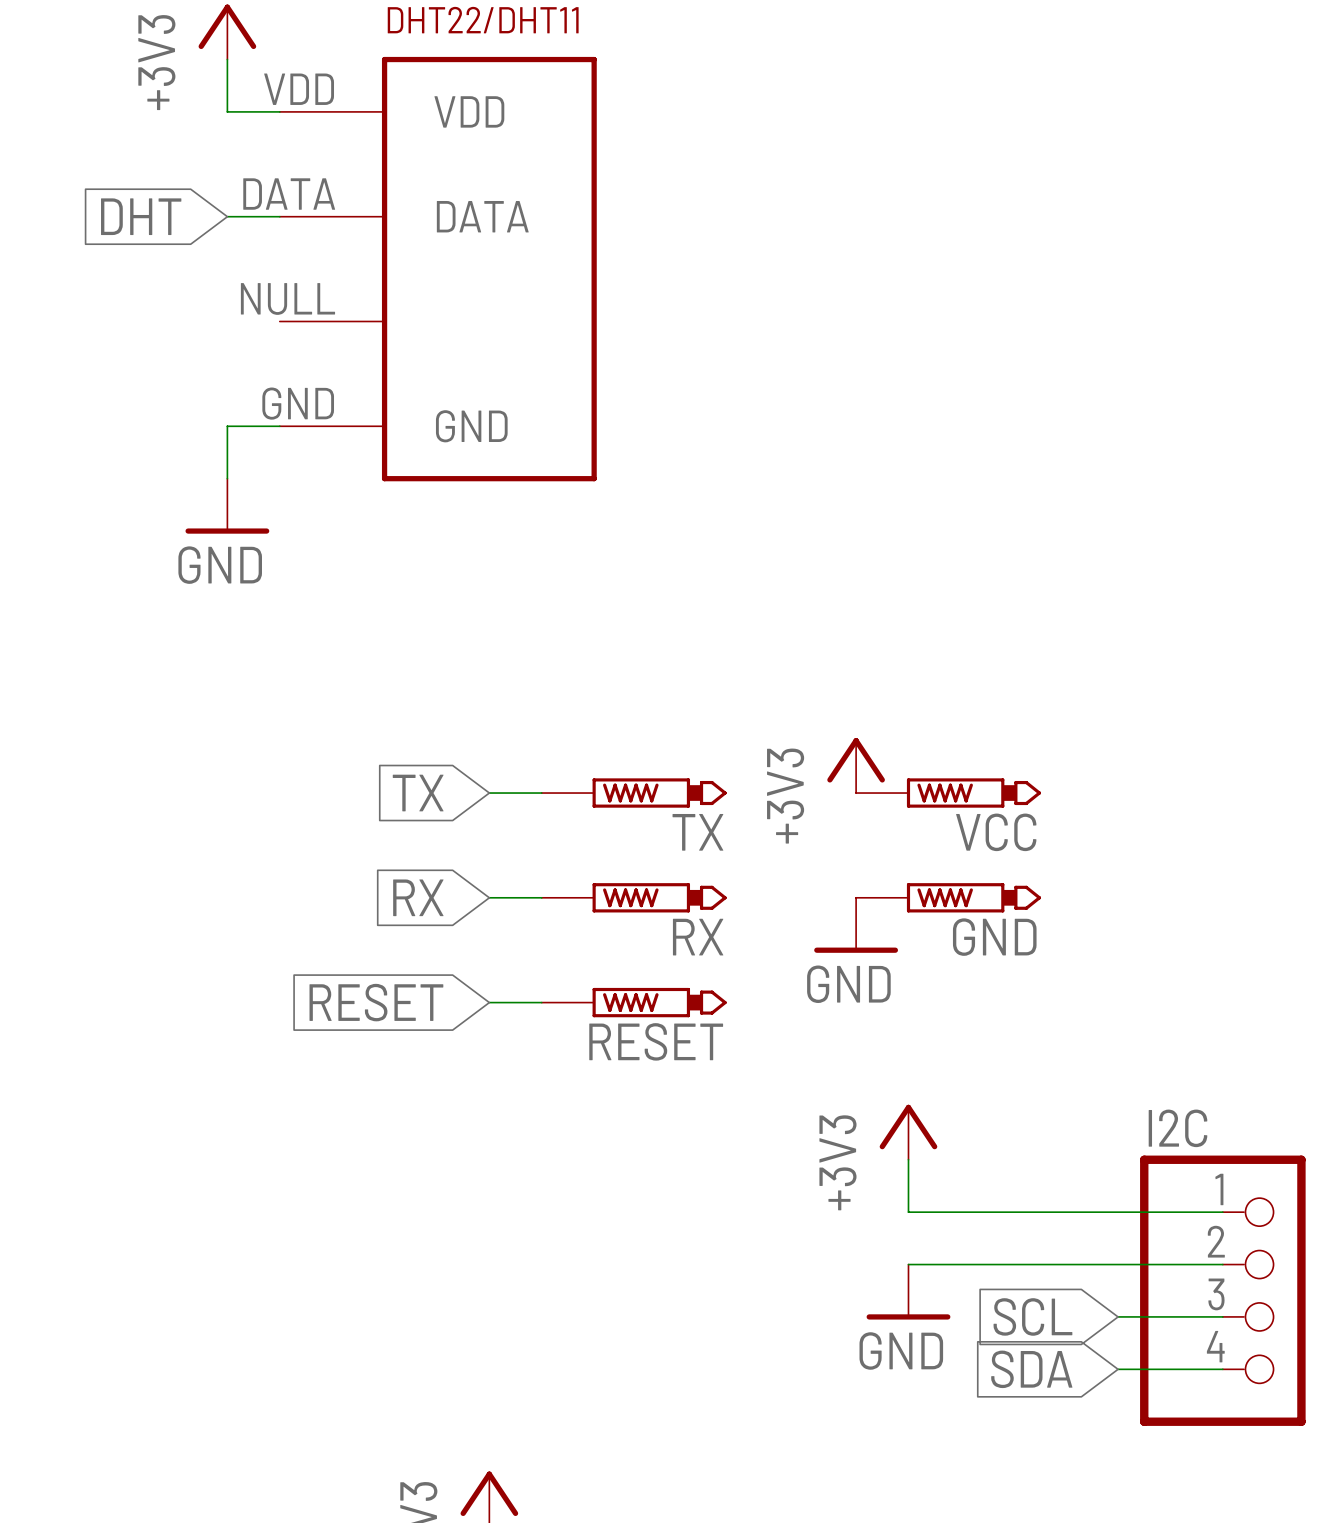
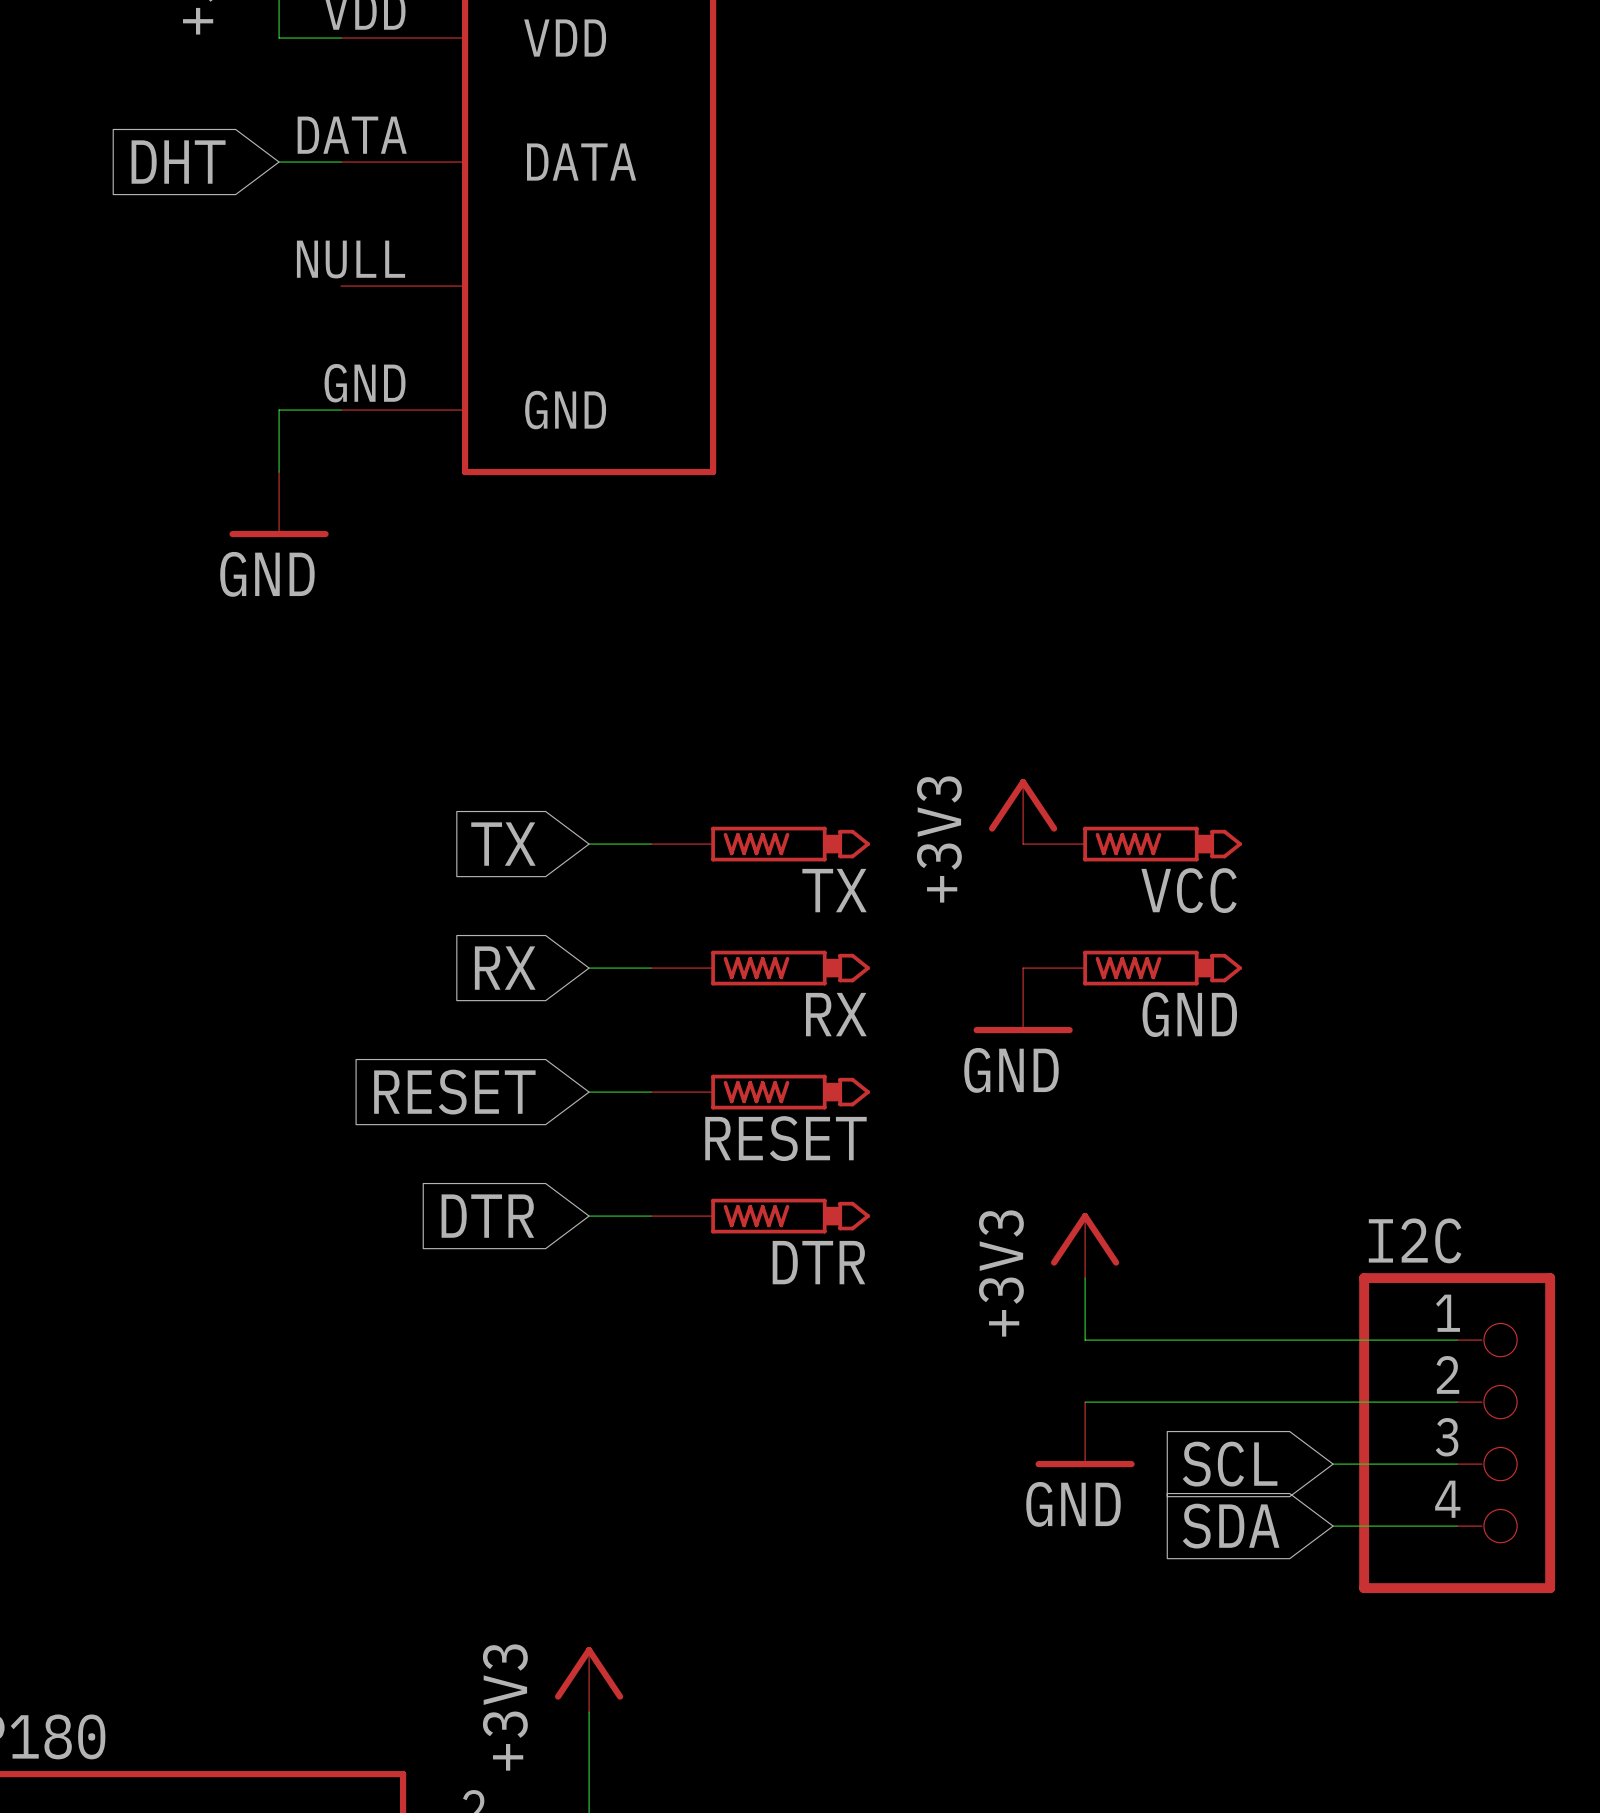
global label: none -> DTR (487, 1216)
wire: none -> (589, 1216) (651, 1216)
DTR: none -> (760, 1216)

